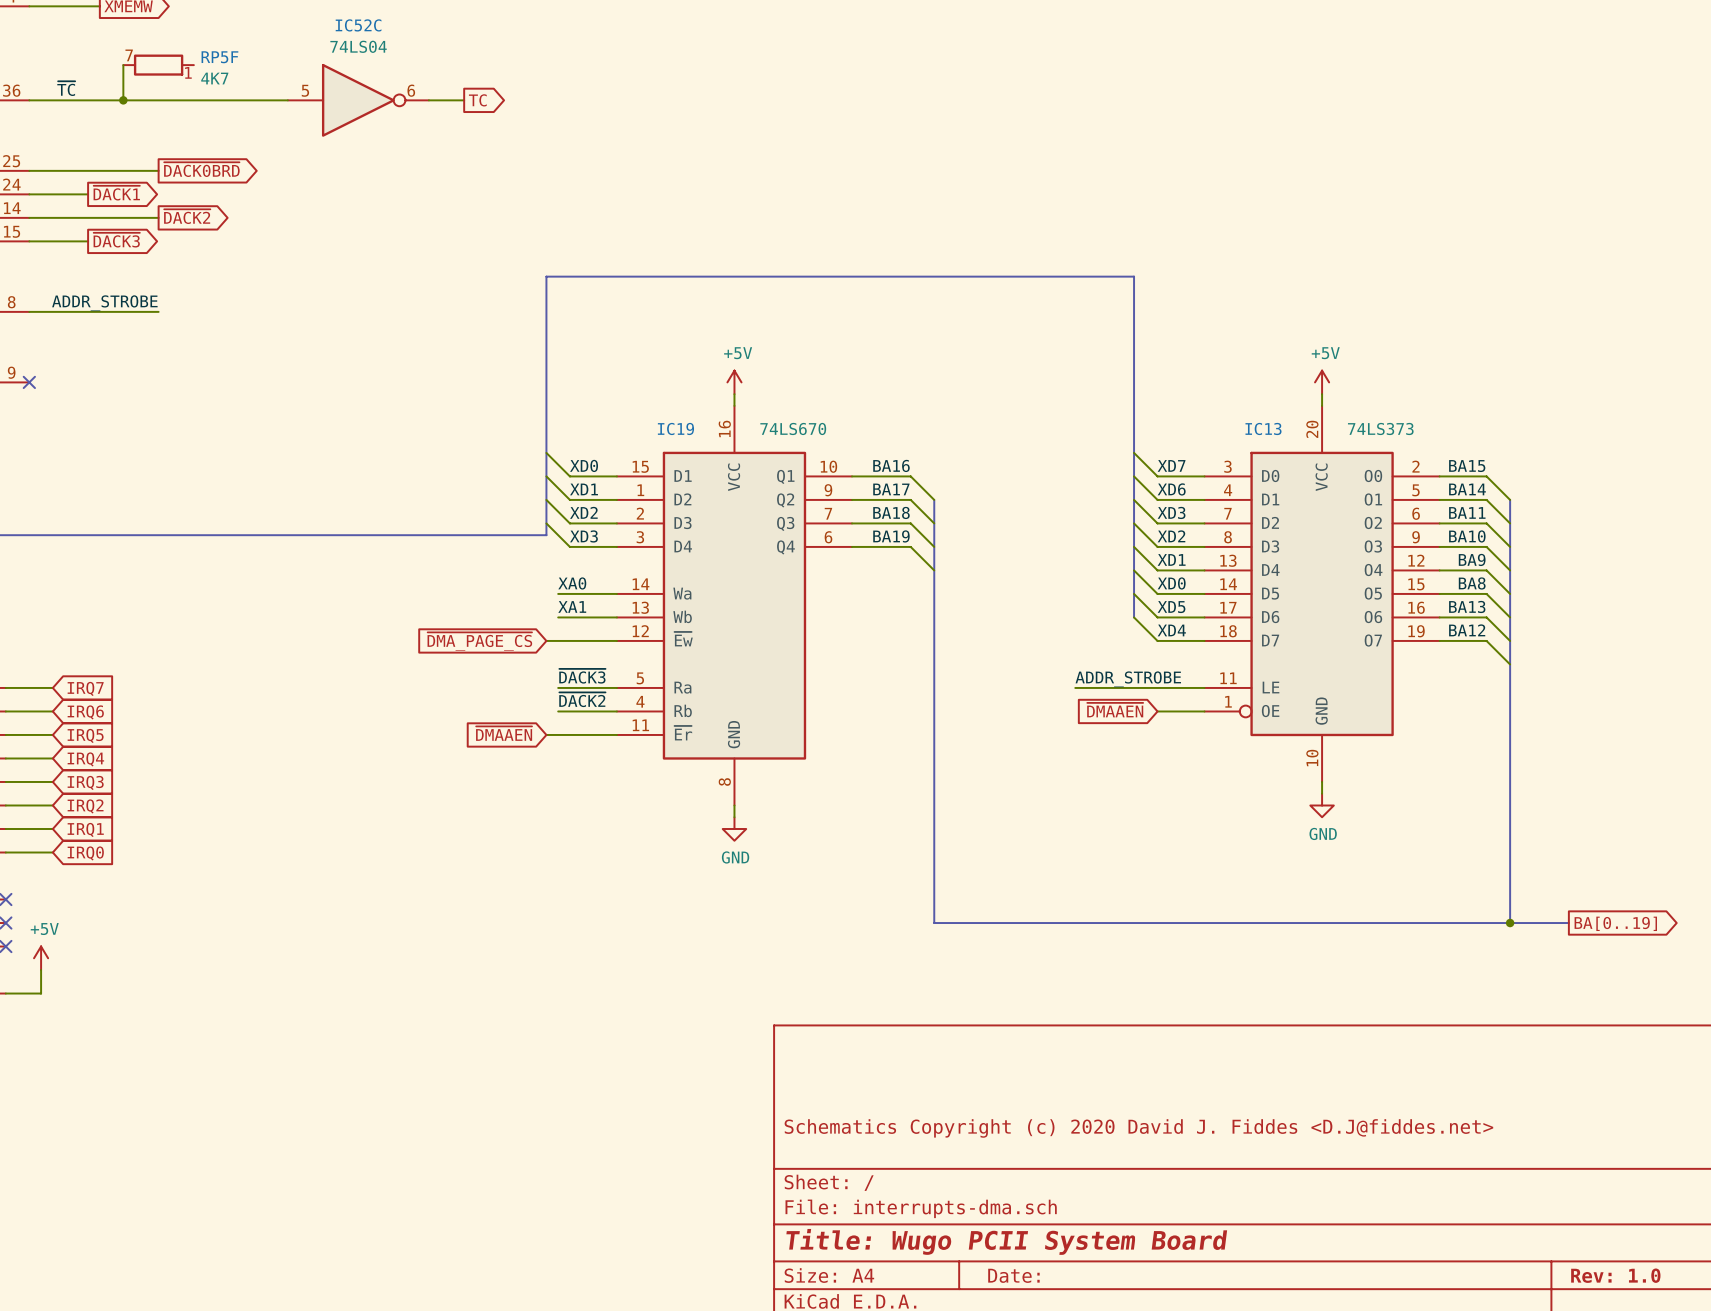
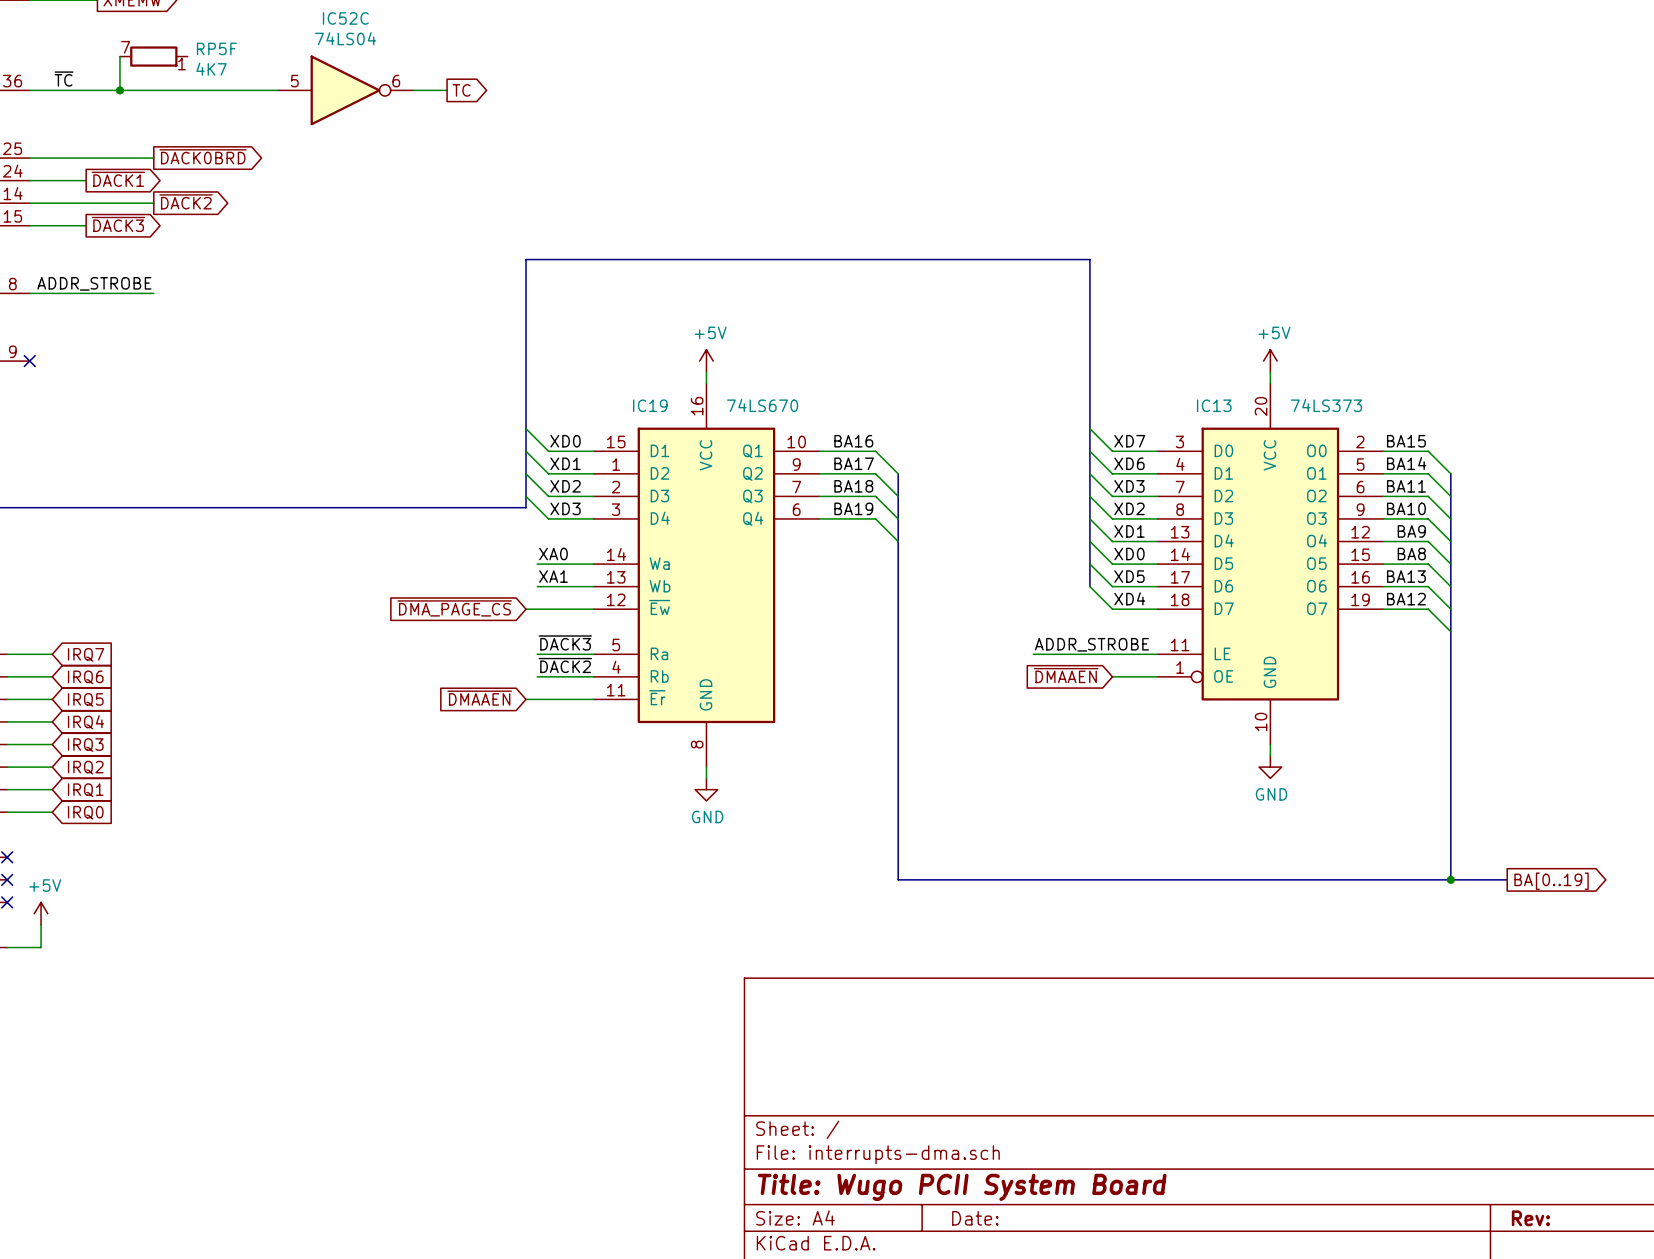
title block: Schematics Copyright (c) 2020 David J. Fiddes <D.J@fiddes.net> (1138, 1128) -> none
title block: Rev: 1.0 (1615, 1275) -> Rev: (1530, 1218)

